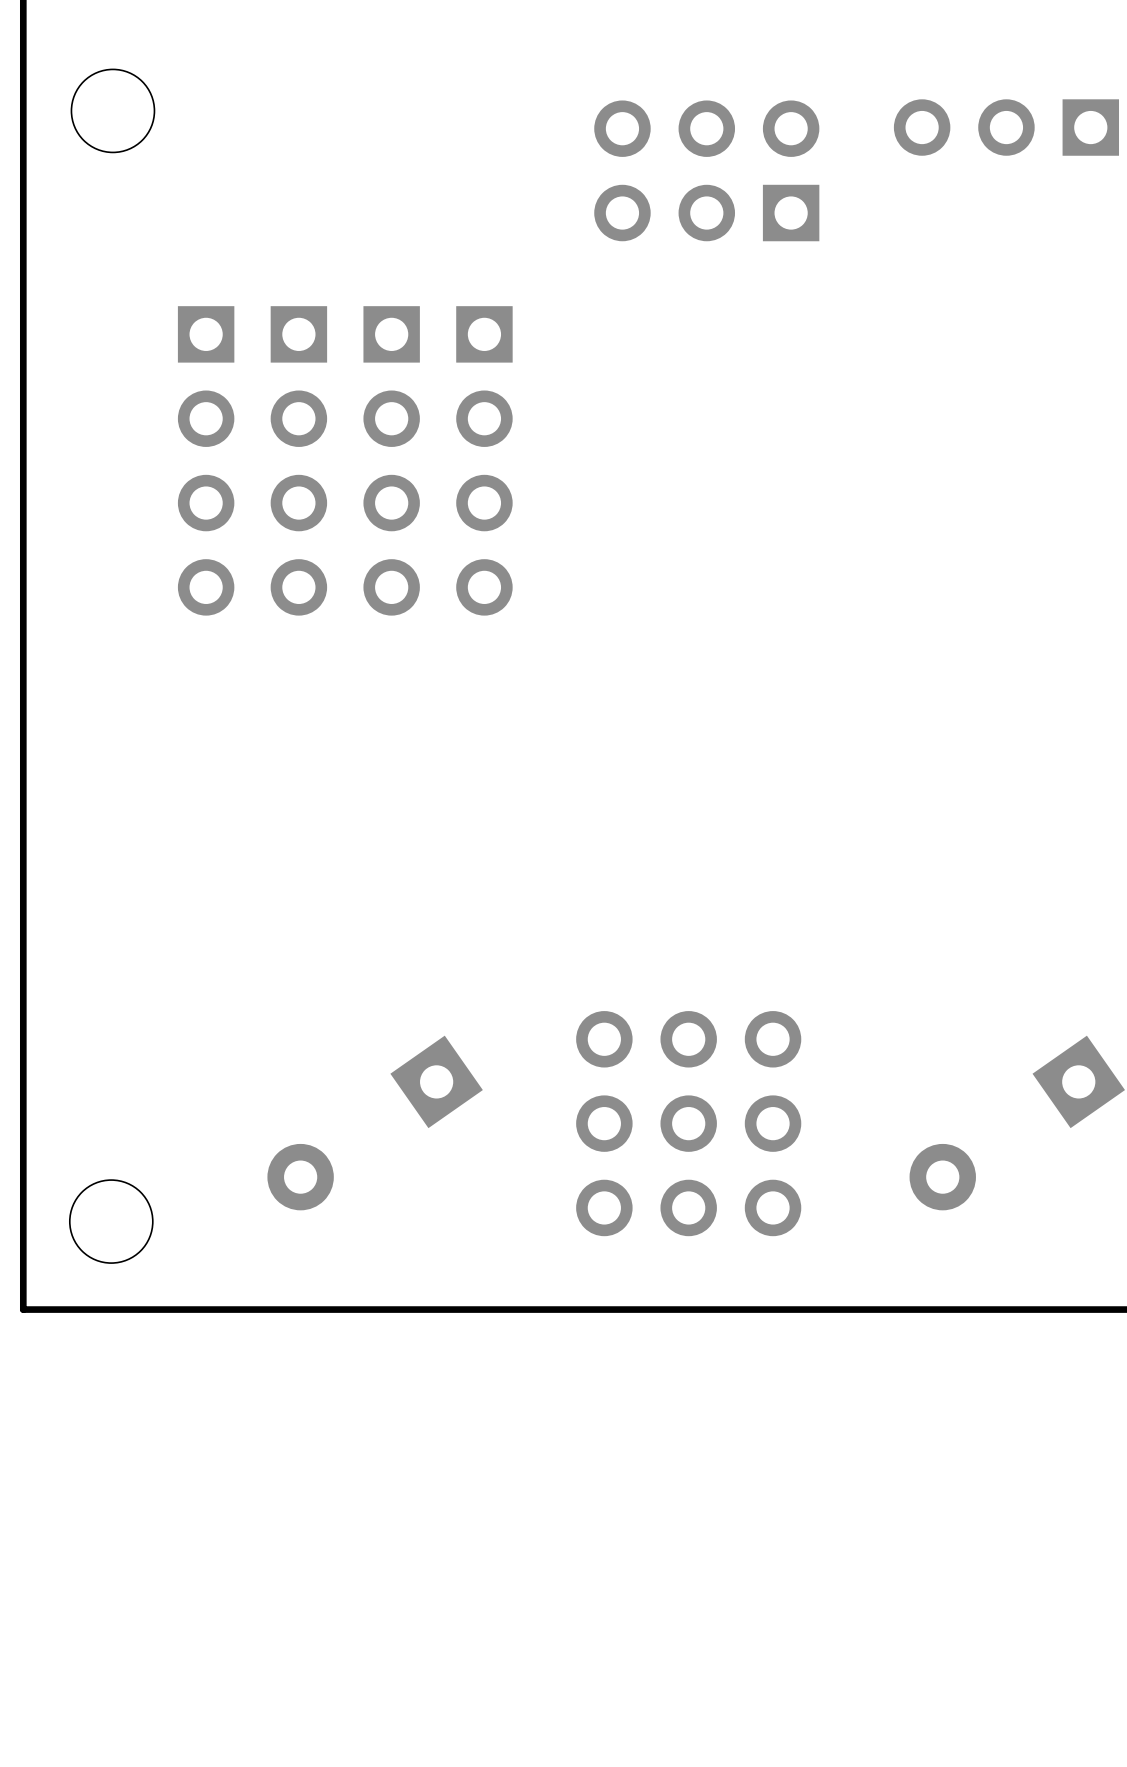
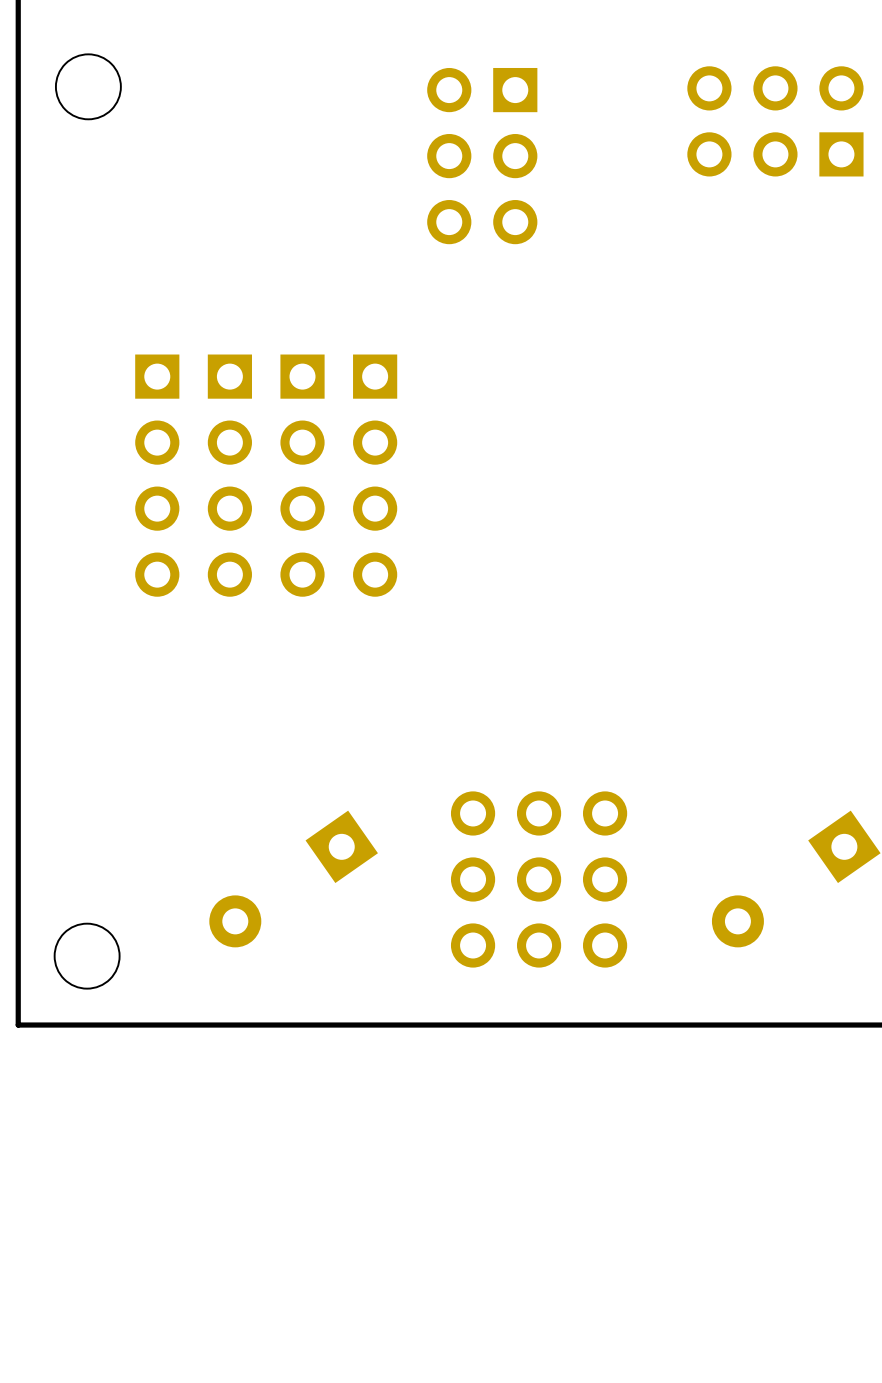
part footprint: [893, 99, 1120, 156] -> [687, 66, 864, 177]
part rotation: 0° (706, 170) -> 90° counterclockwise (482, 156)
part: (206, 460) -> none
part: (298, 460) -> none
part: (391, 460) -> none
part: (484, 460) -> none
part: none -> (157, 475)
part: none -> (229, 475)
part: none -> (302, 475)
part: none -> (375, 475)

